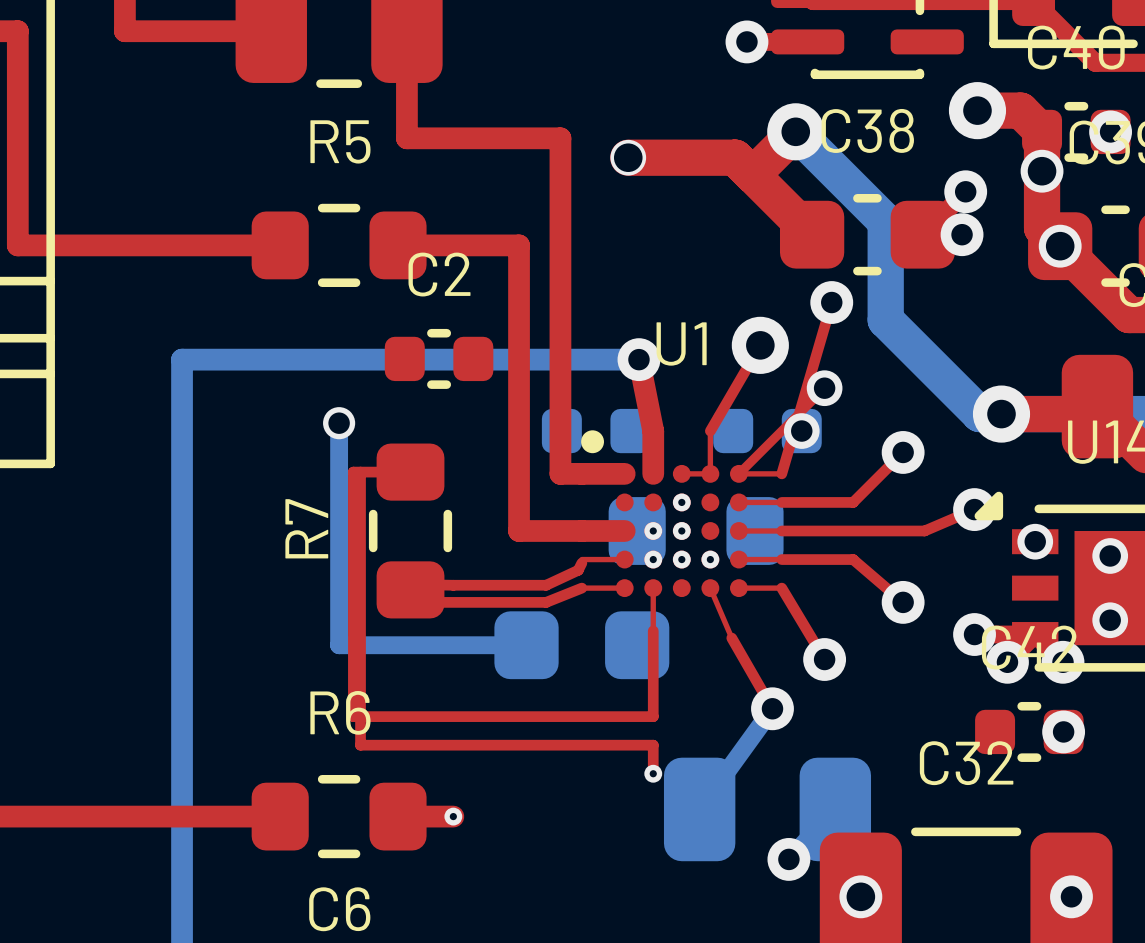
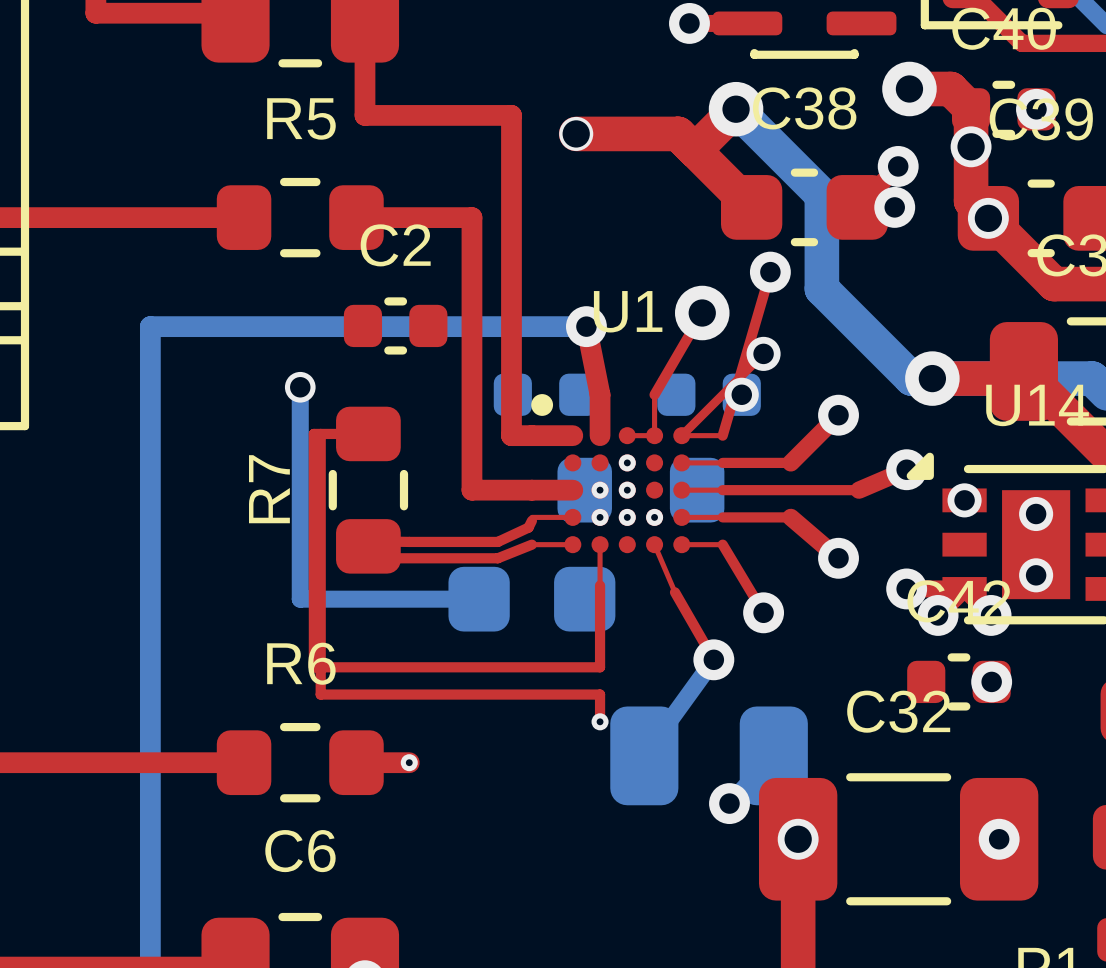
top track width: thin (903, 452) (853, 502) -> thick (838, 415) (790, 462)
top track width: thin (974, 509) (924, 530) -> thick (906, 469) (858, 490)
top track width: thin (853, 559) (903, 602) -> thick (790, 517) (838, 558)

